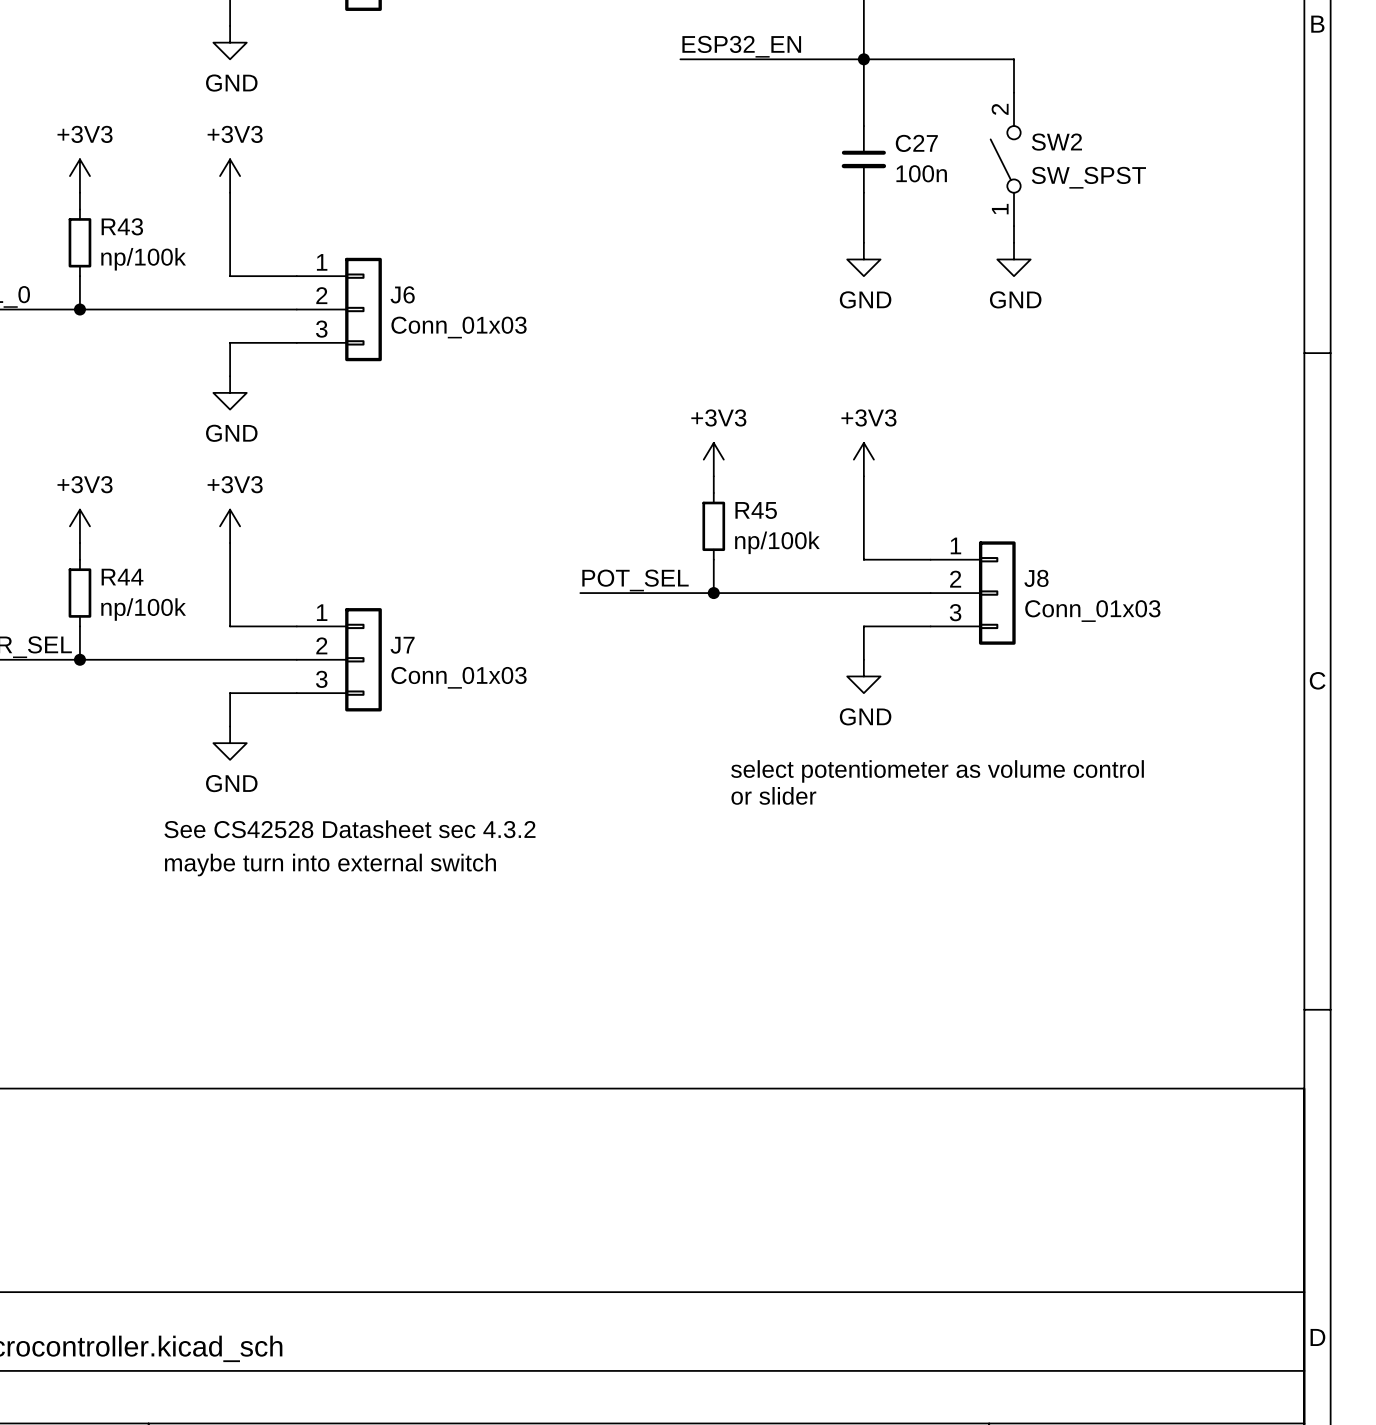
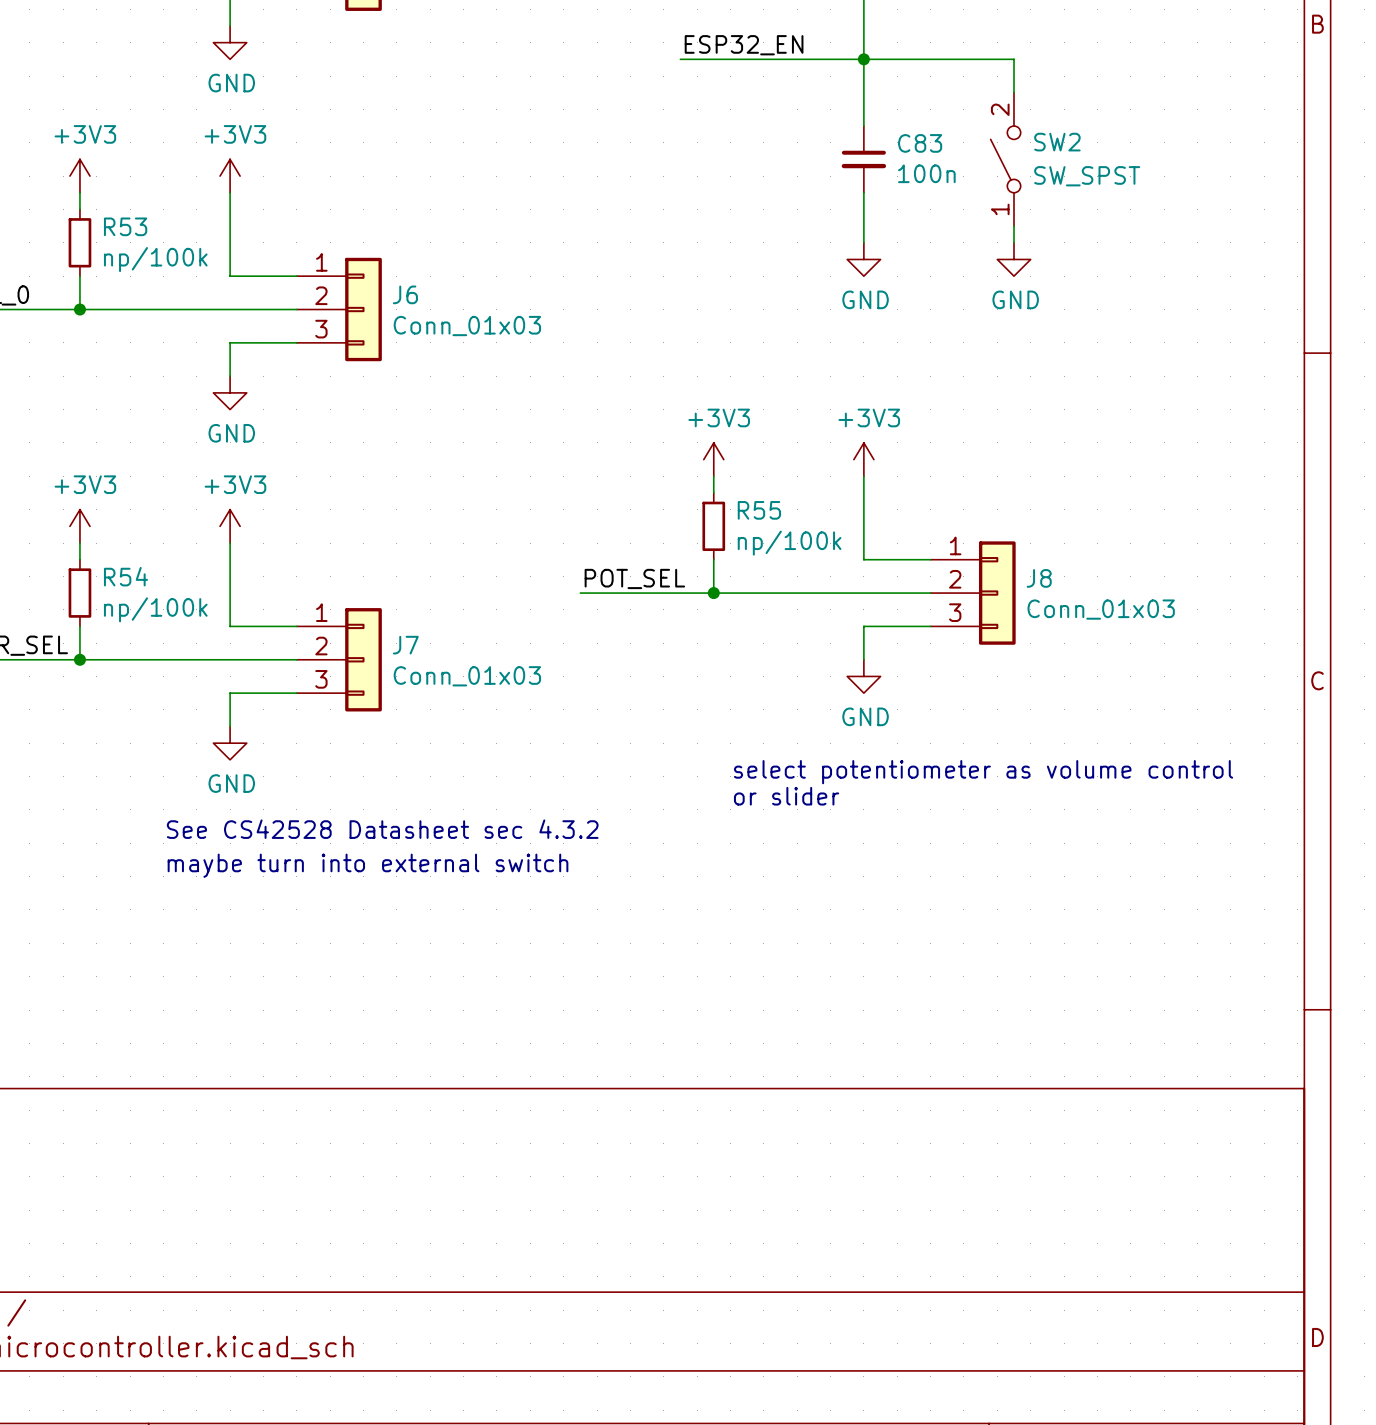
C27 name: C27 (916, 143) -> C83 (920, 143)
R43 name: R43 (122, 226) -> R53 (125, 226)
R45 name: R45 (756, 510) -> R55 (759, 510)
R44 name: R44 (122, 577) -> R54 (125, 576)

